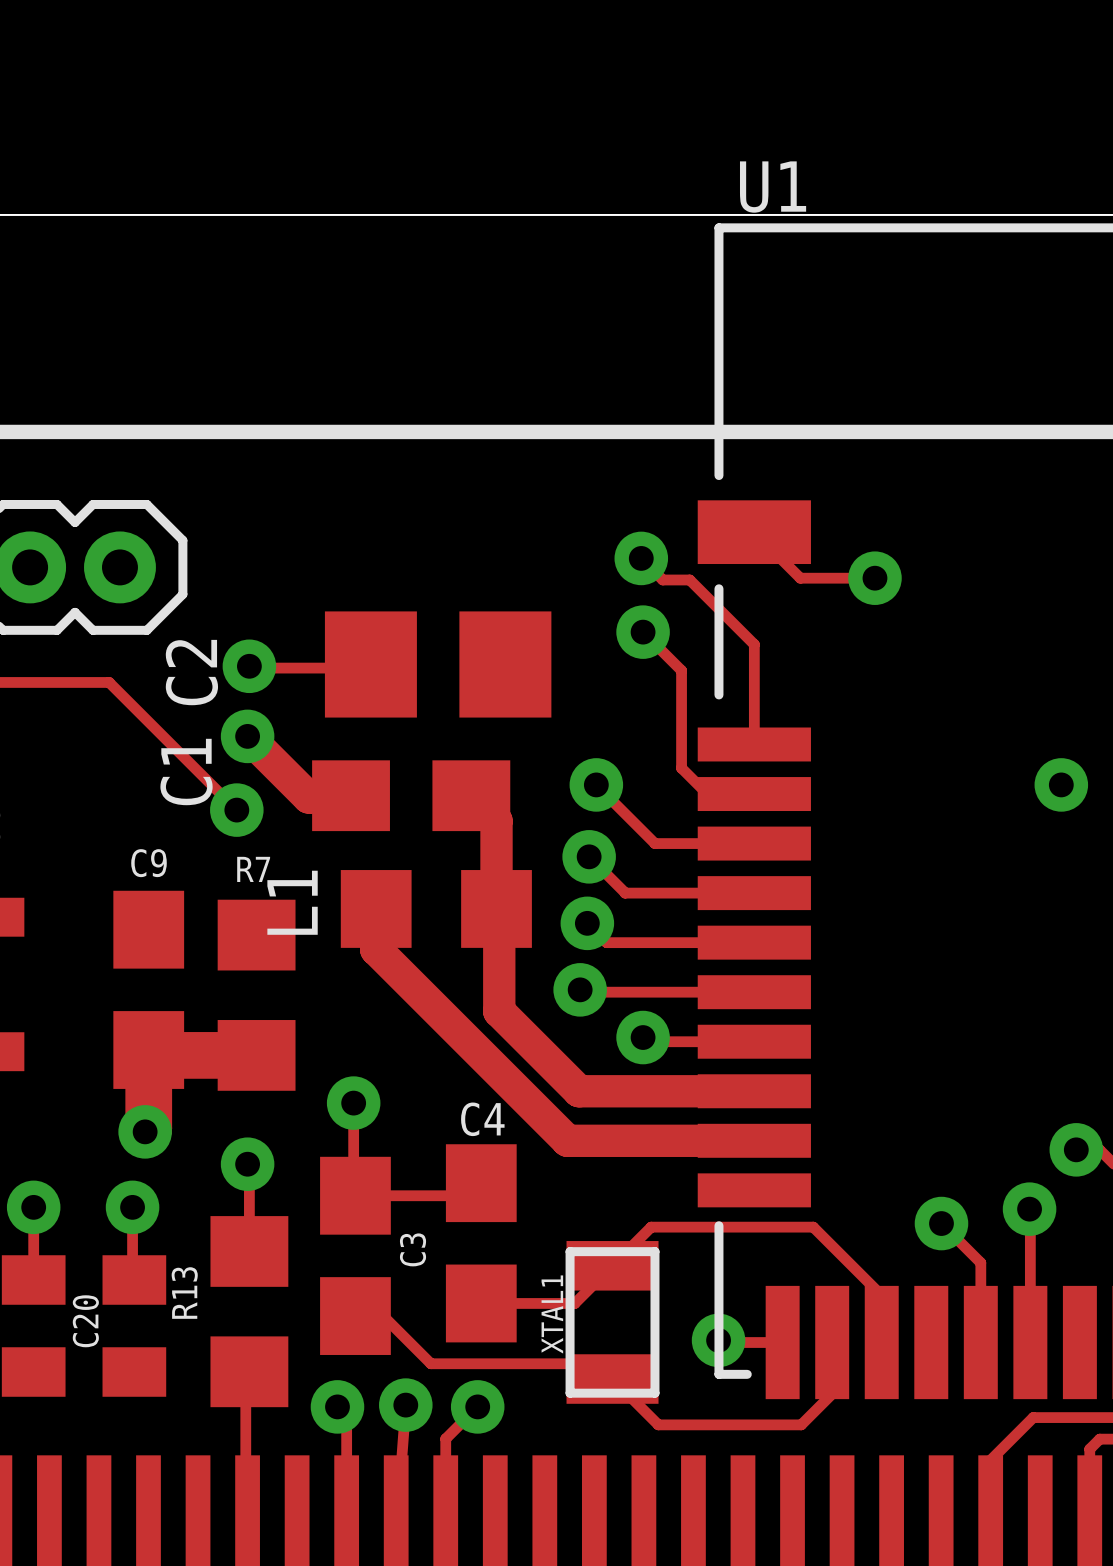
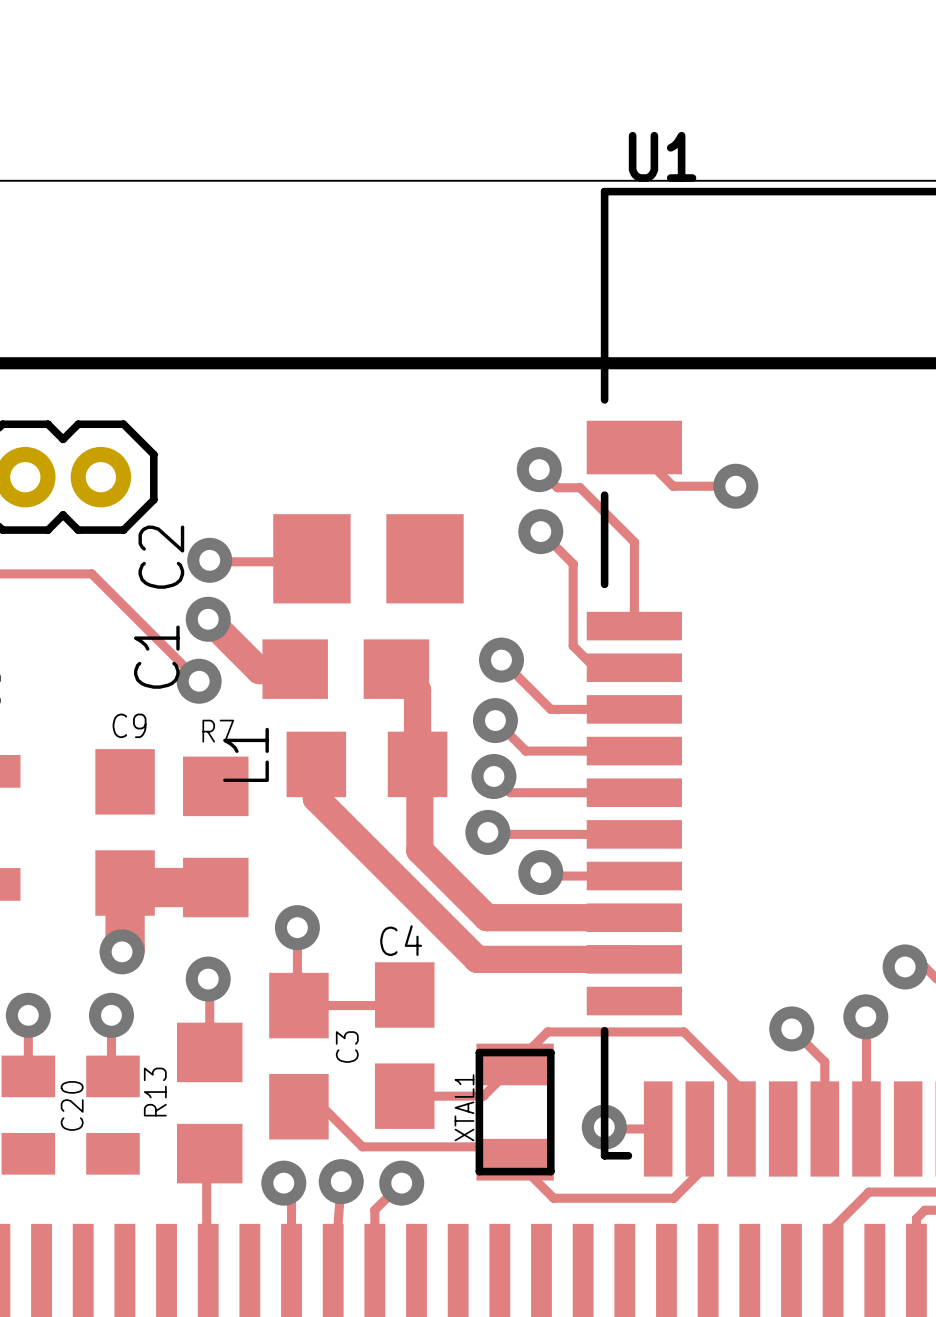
via: (1061, 784) -> none

